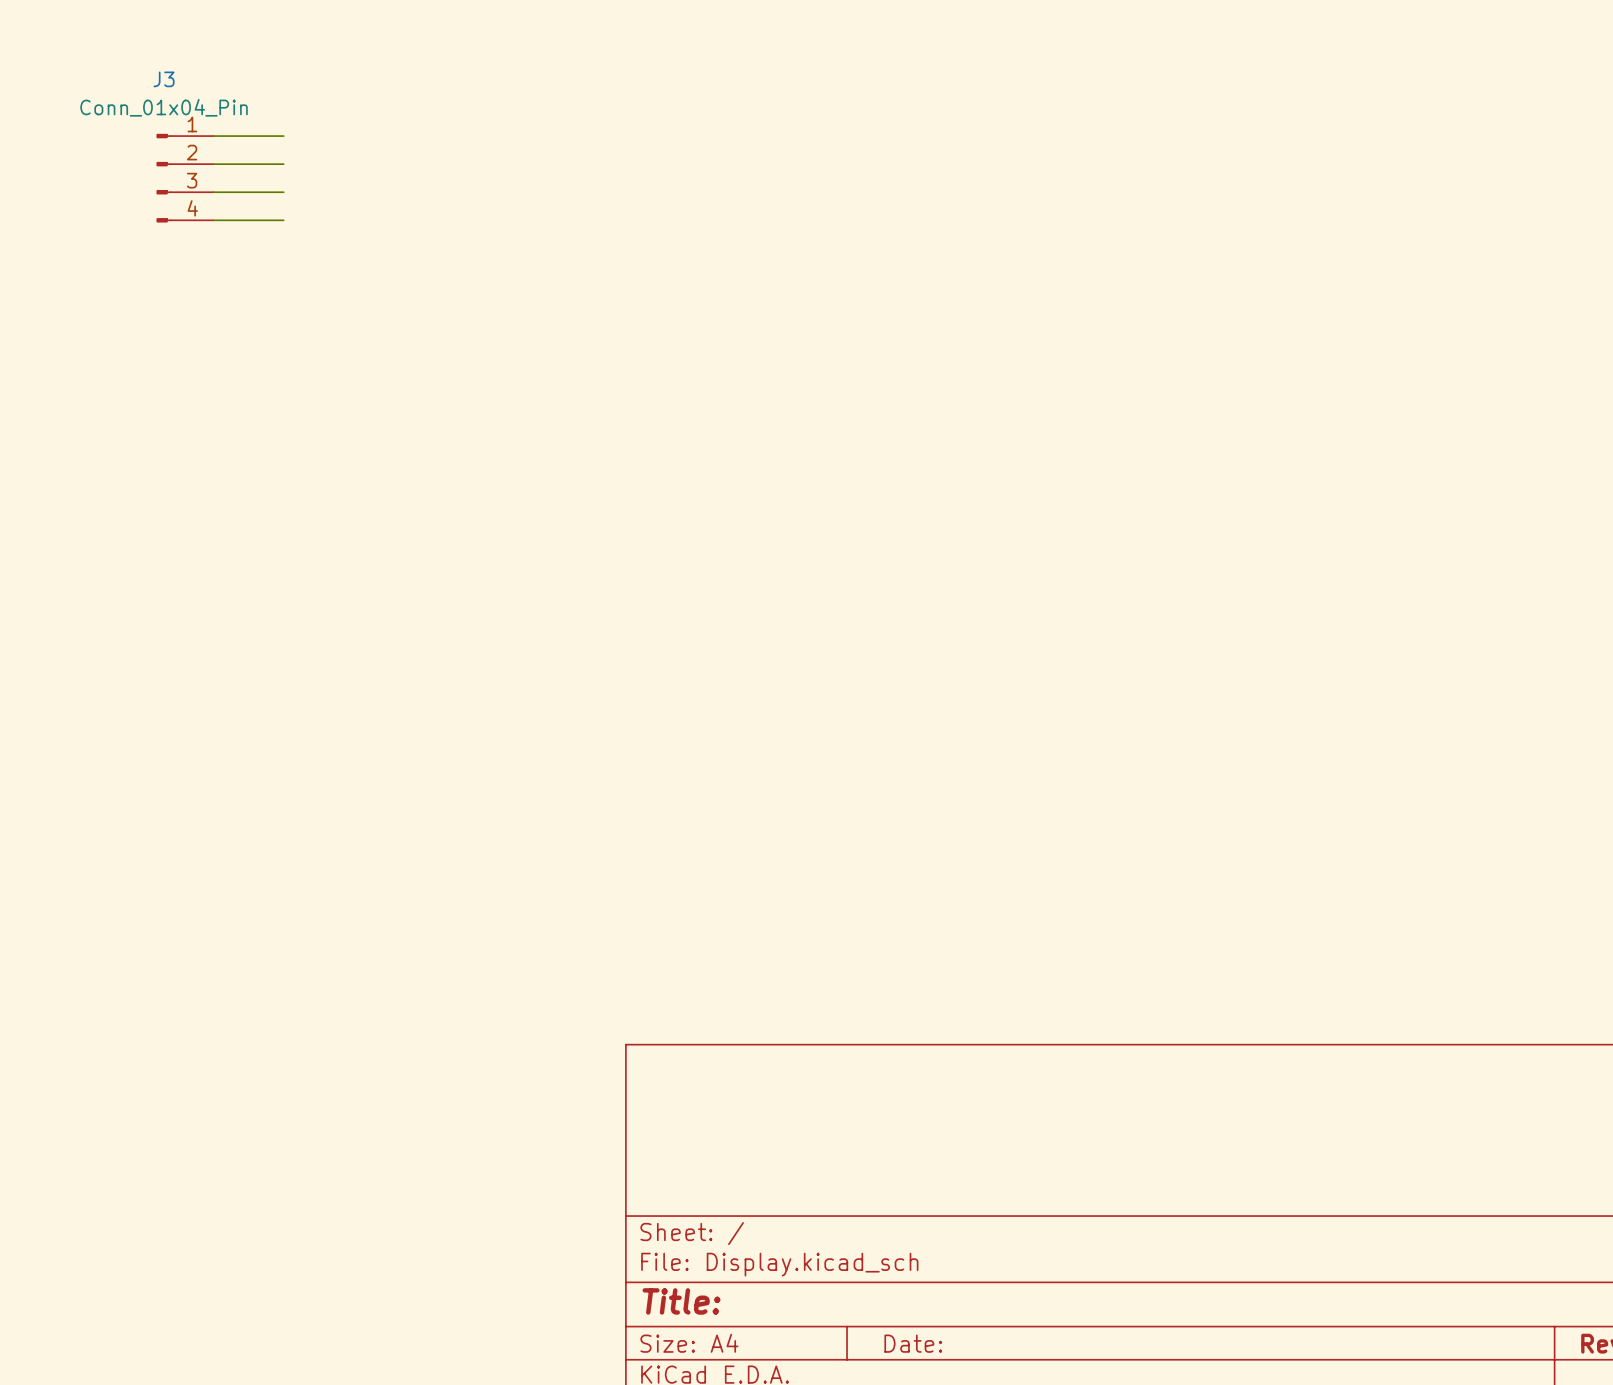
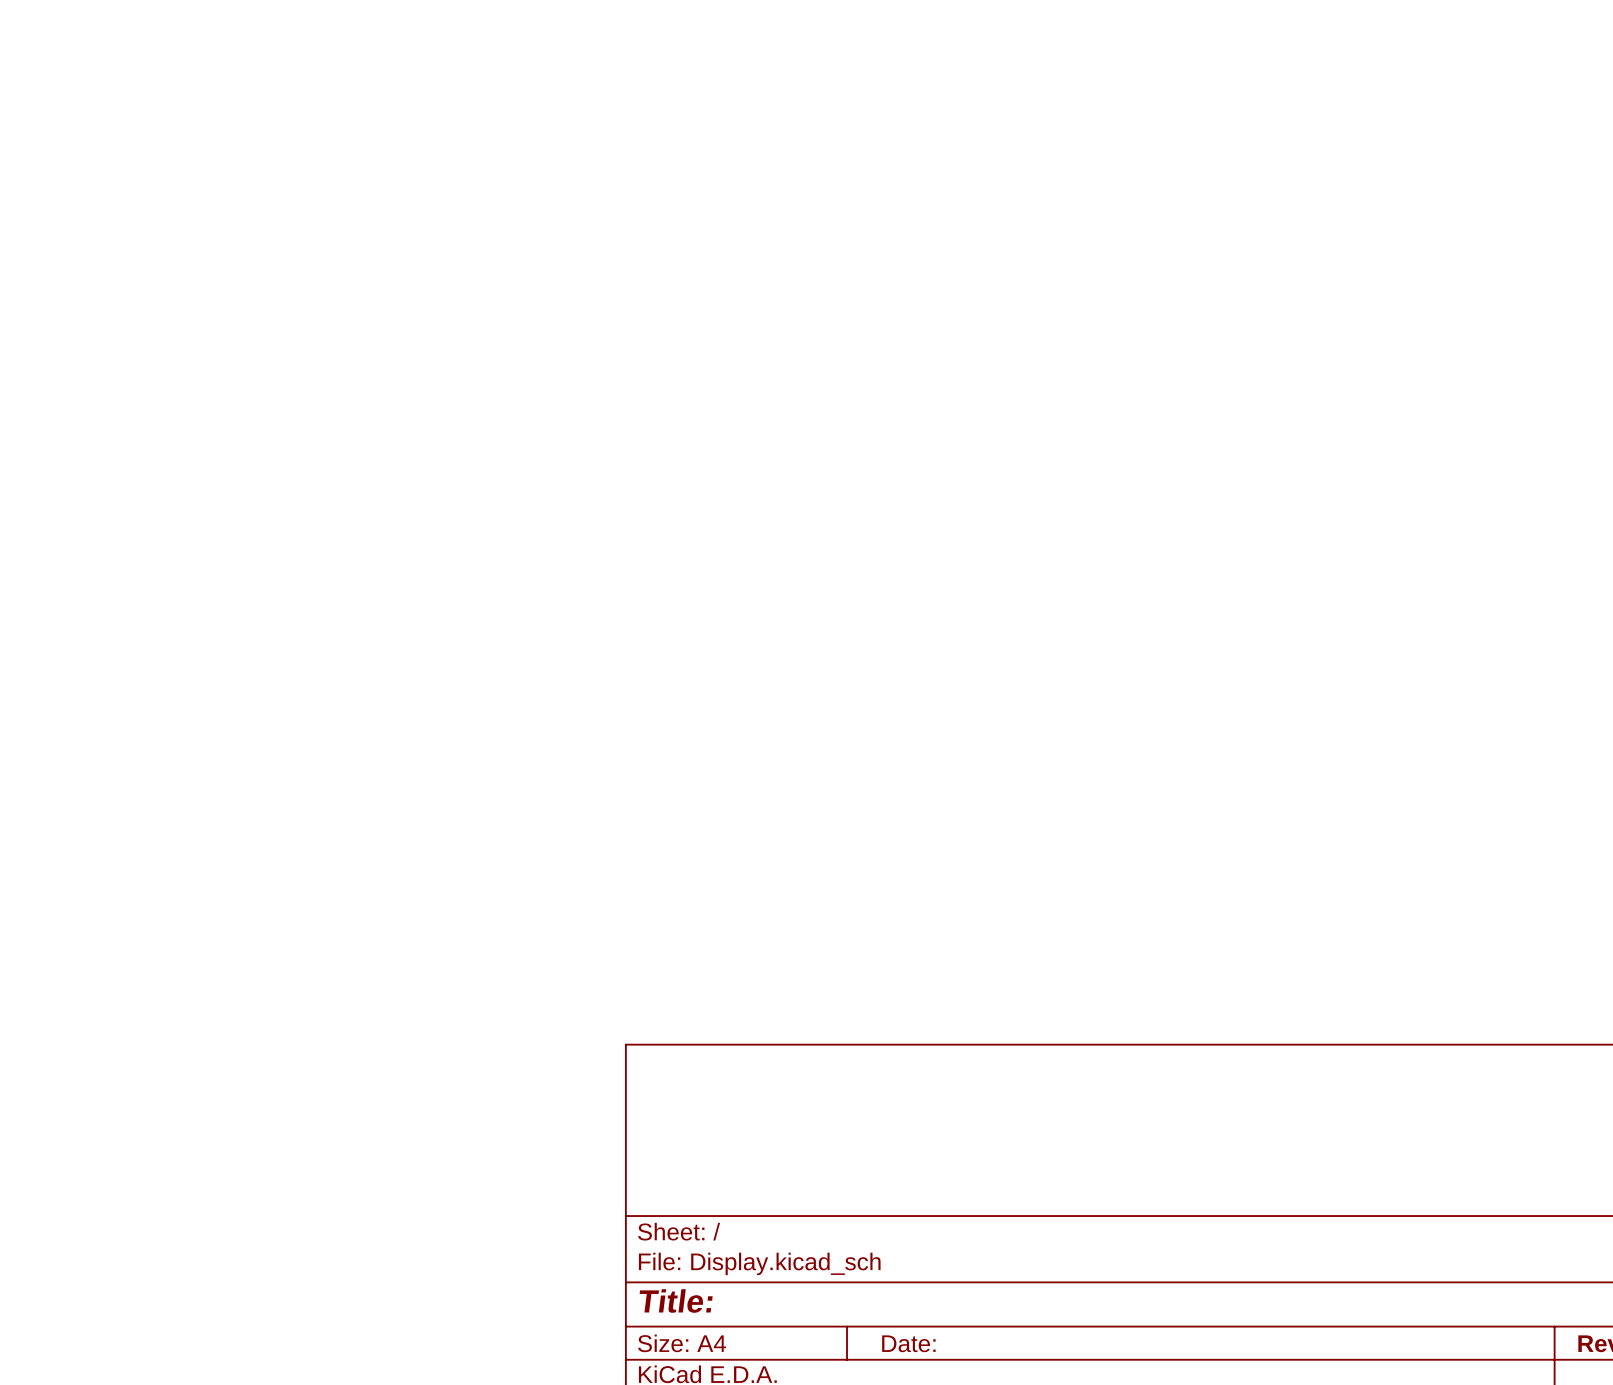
wire: (213, 136) (283, 136) -> none
wire: (213, 164) (283, 164) -> none
J3: Conn_01x04_Pin (185, 178) -> none
wire: (213, 192) (283, 192) -> none
wire: (213, 220) (283, 220) -> none

